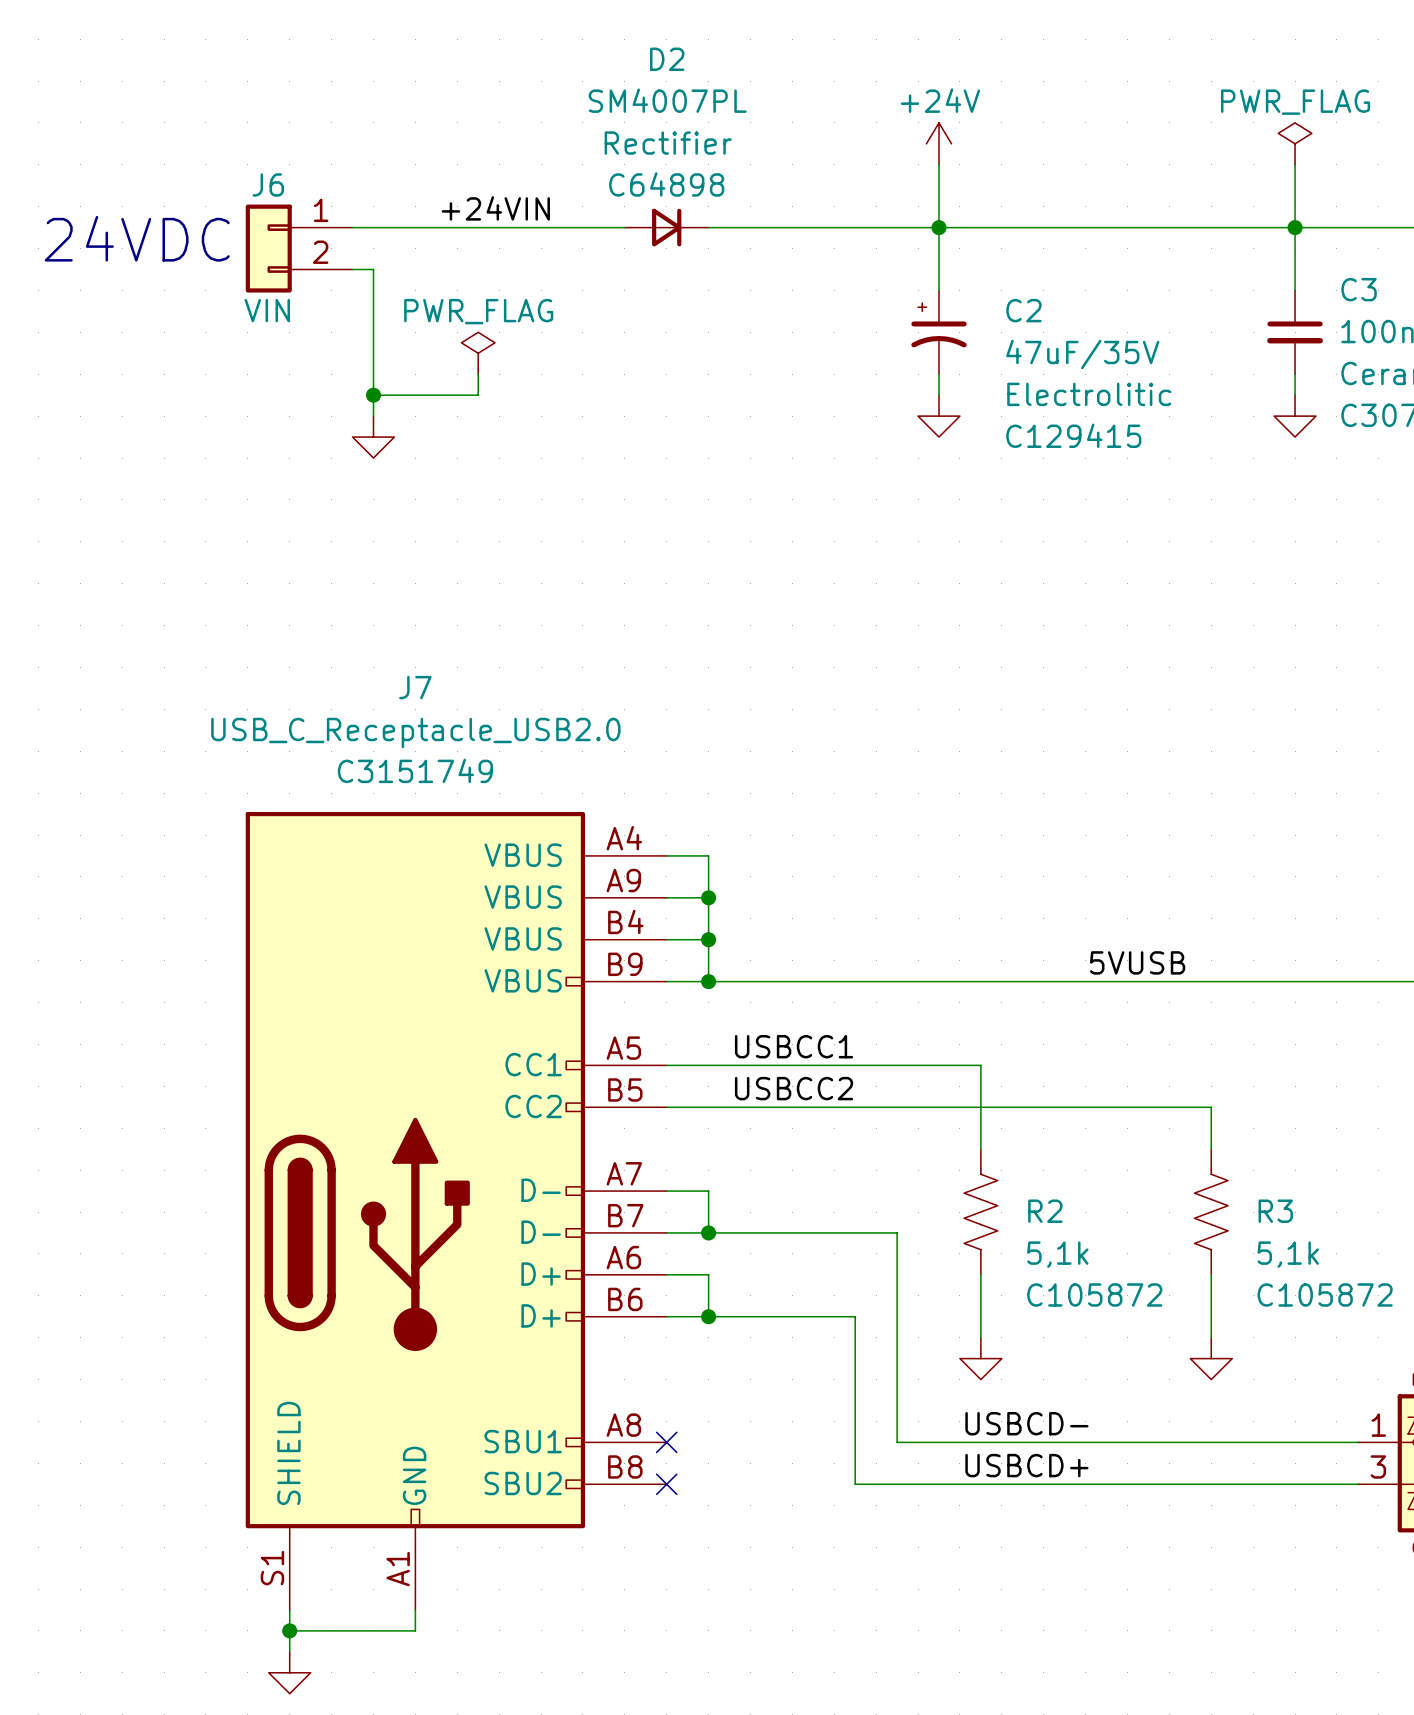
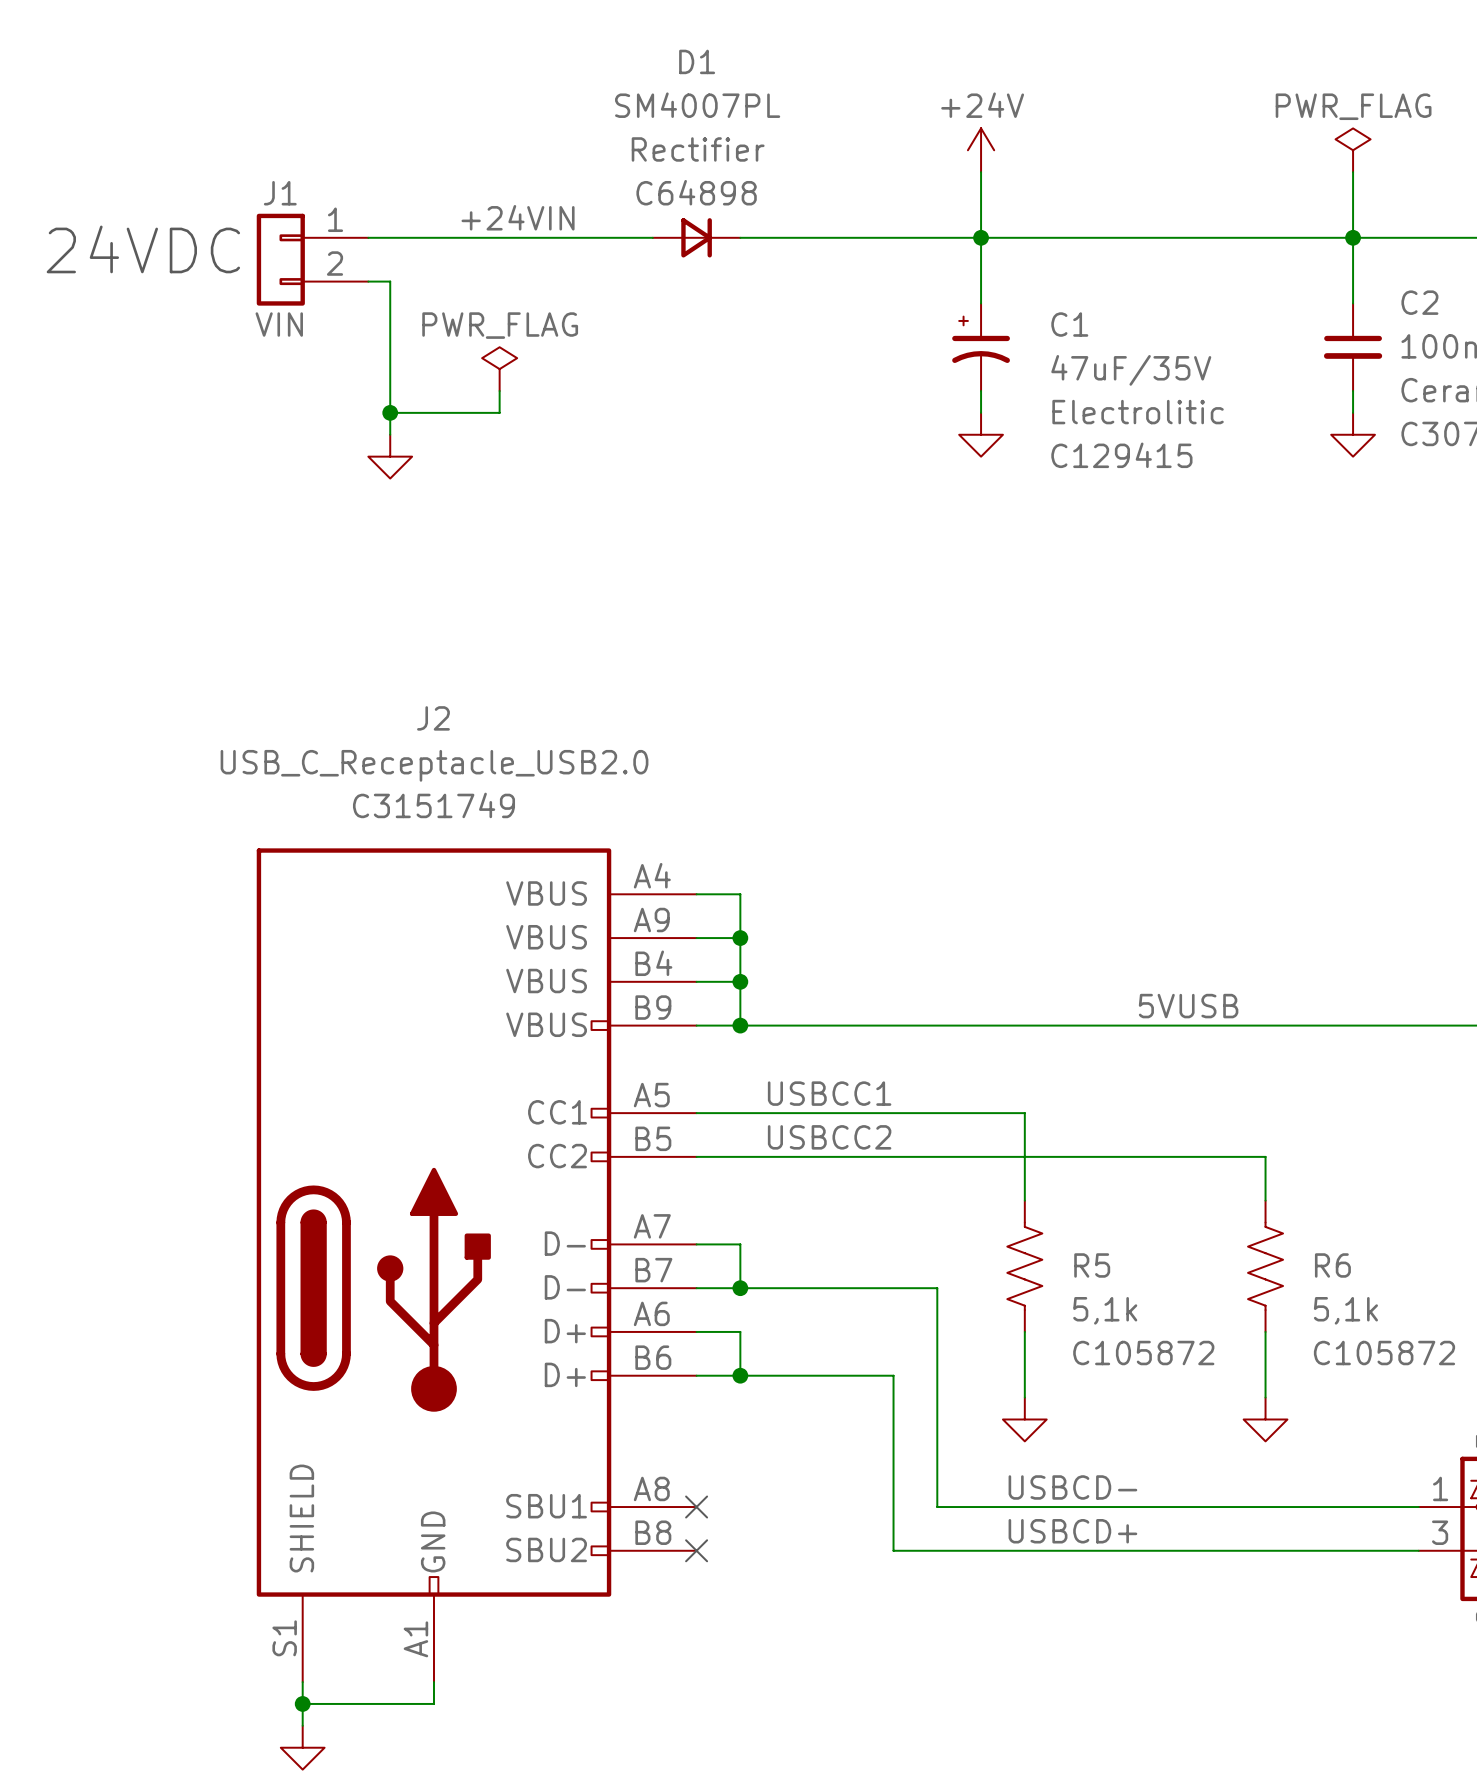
D2 name: D2 (667, 59) -> D1 (697, 61)
J6 name: J6 (268, 184) -> J1 (280, 193)
C3 name: C3 (1359, 289) -> C2 (1419, 302)
C2 name: C2 (1023, 310) -> C1 (1069, 324)
J7 name: J7 (415, 687) -> J2 (433, 718)
R2 name: R2 (1045, 1211) -> R5 (1092, 1265)
R3 name: R3 (1275, 1211) -> R6 (1332, 1265)

